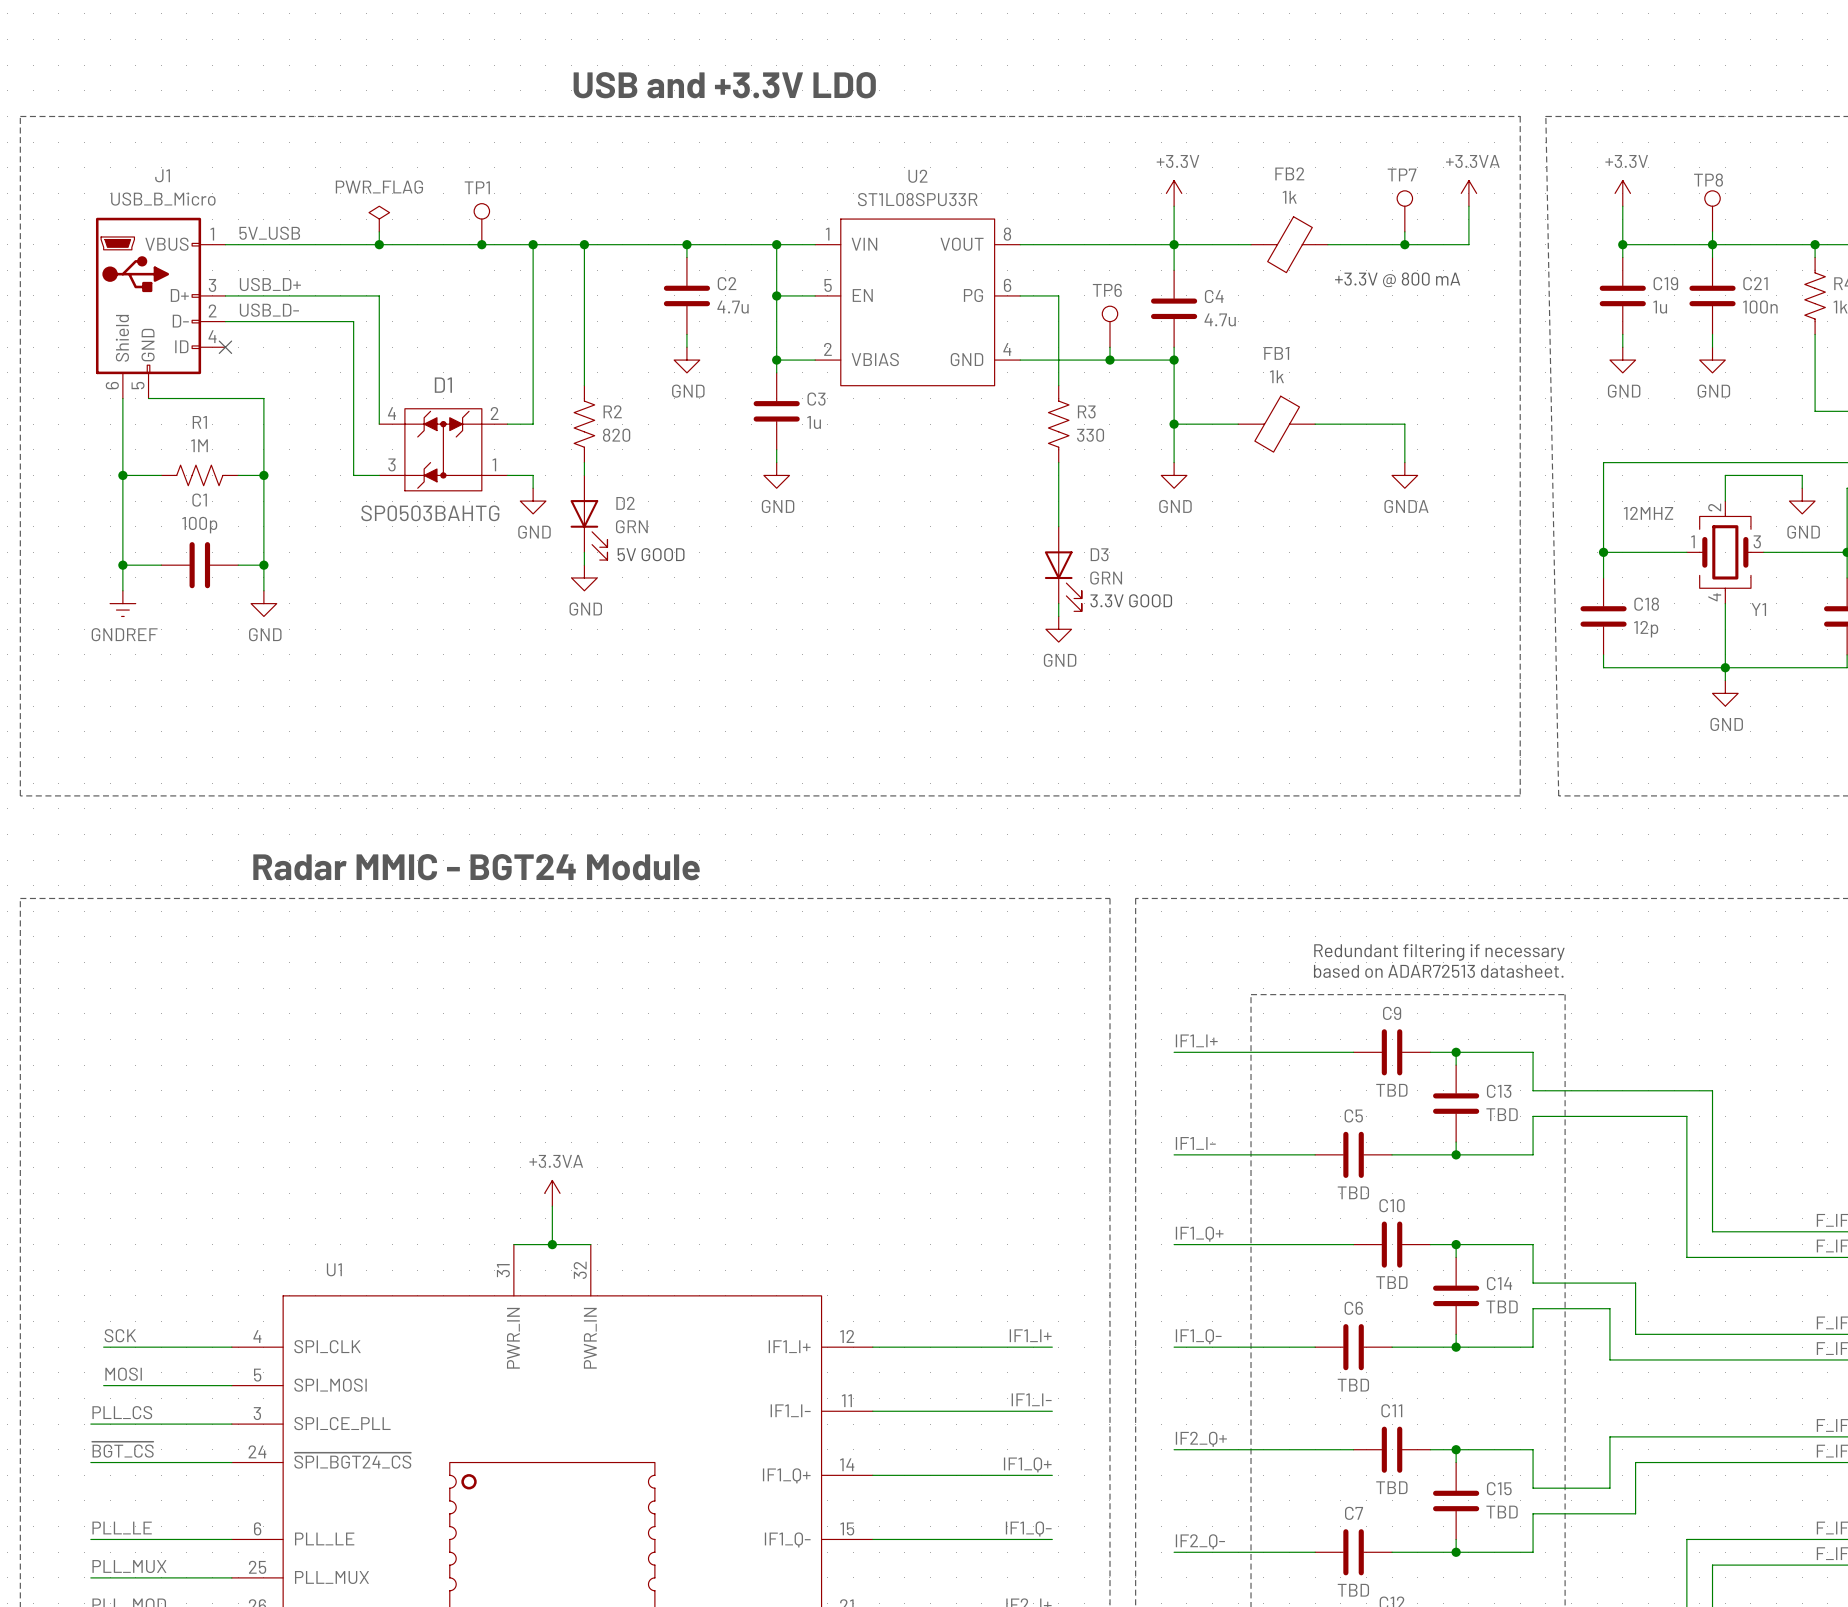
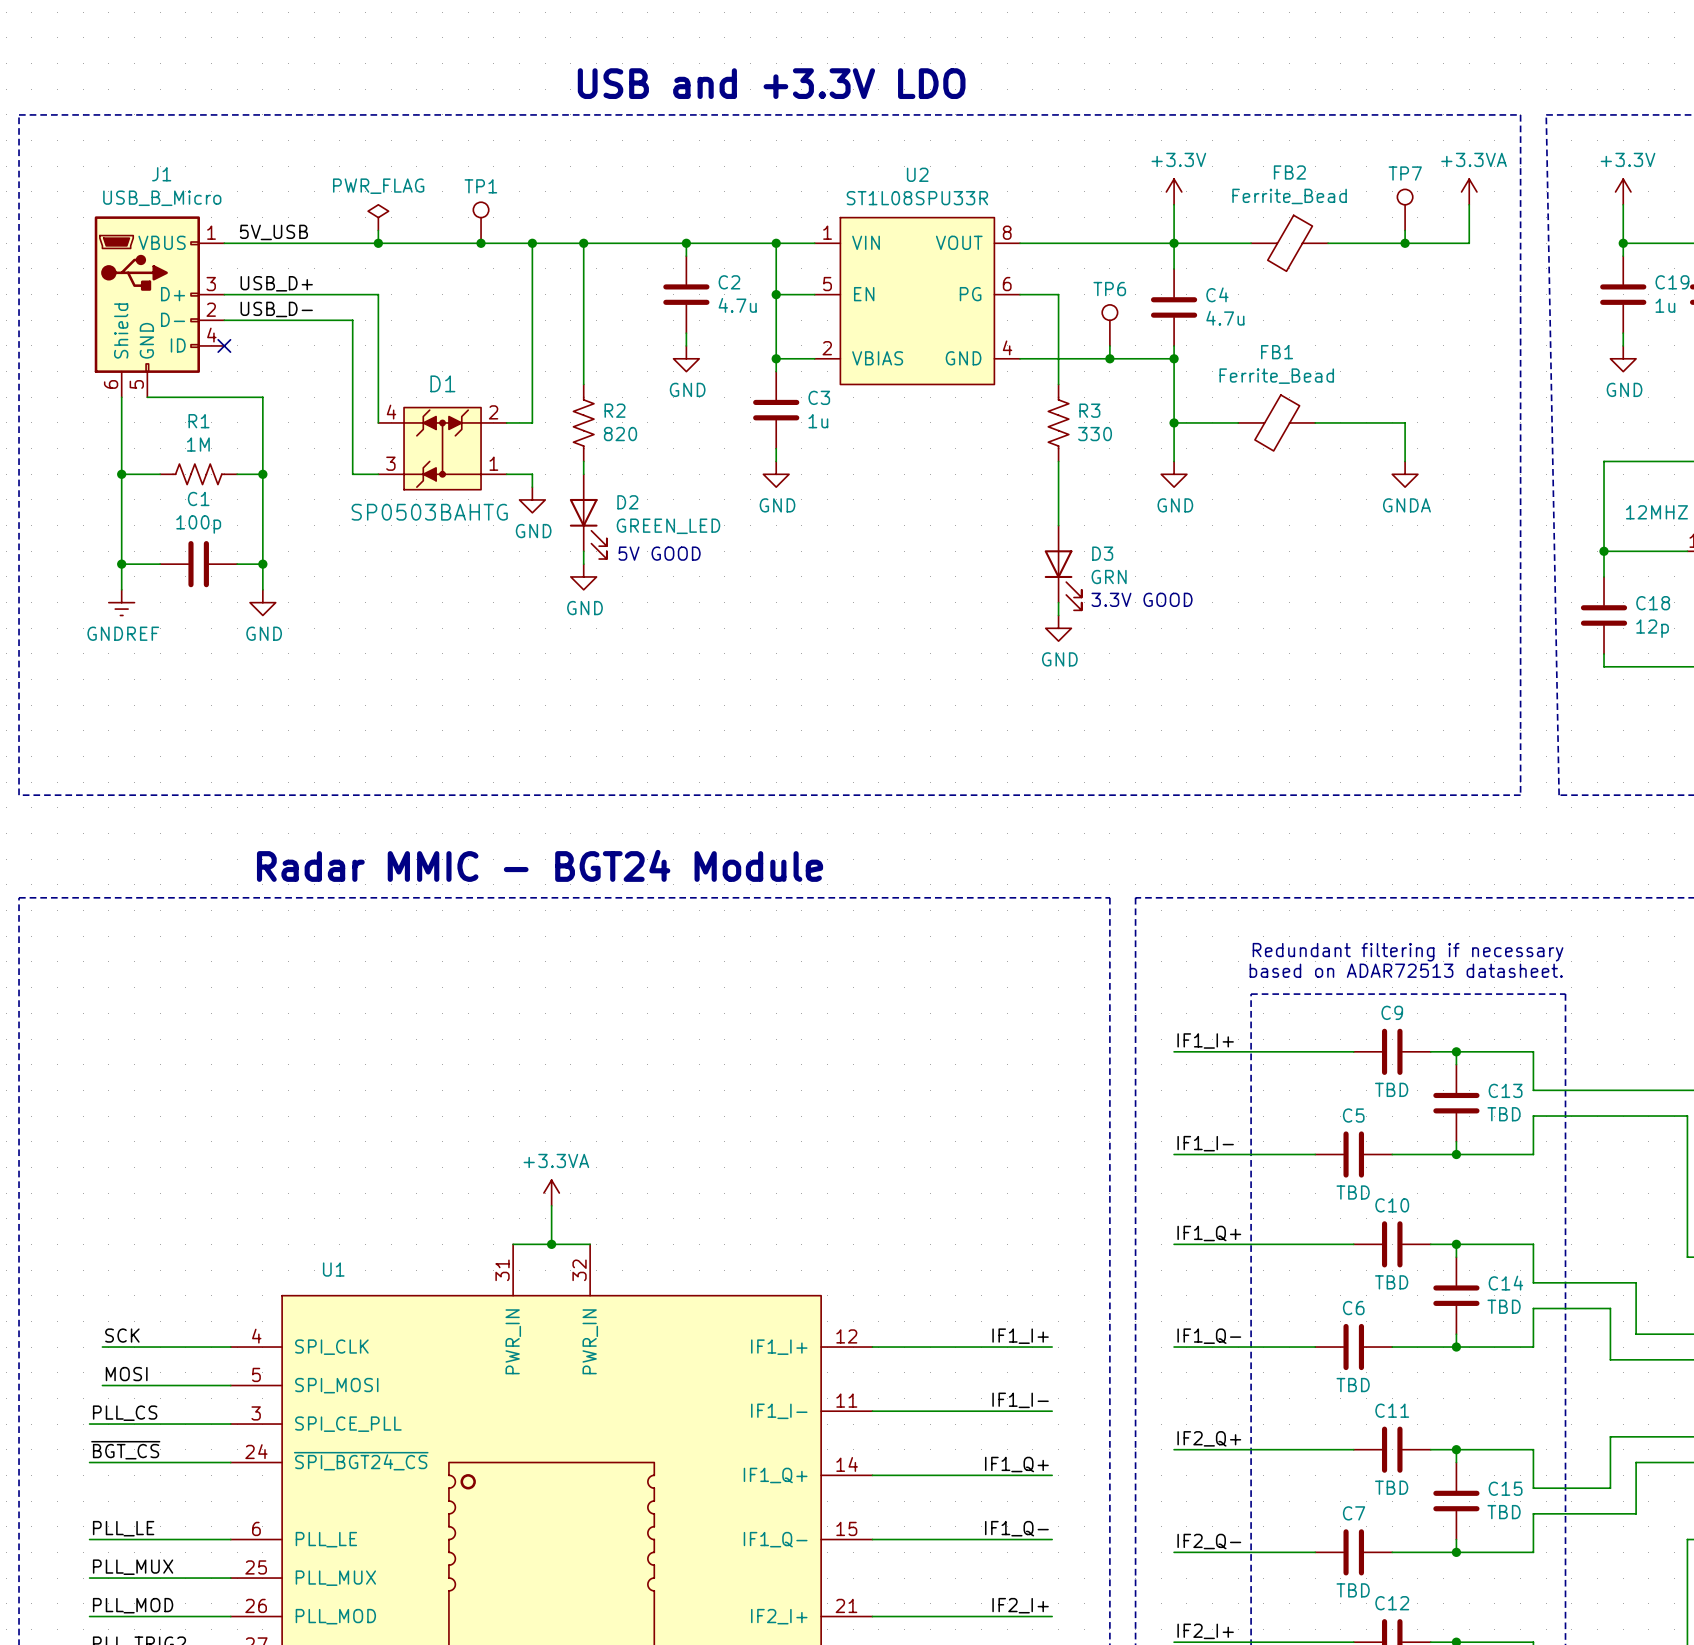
FB2 value: 1k (1289, 197) -> Ferrite_Bead (1289, 196)
text: +3.3V @ 800 mA (1397, 279) -> none
FB1 value: 1k (1276, 376) -> Ferrite_Bead (1276, 376)
D2 value: GRN (631, 526) -> GREEN_LED (668, 526)

